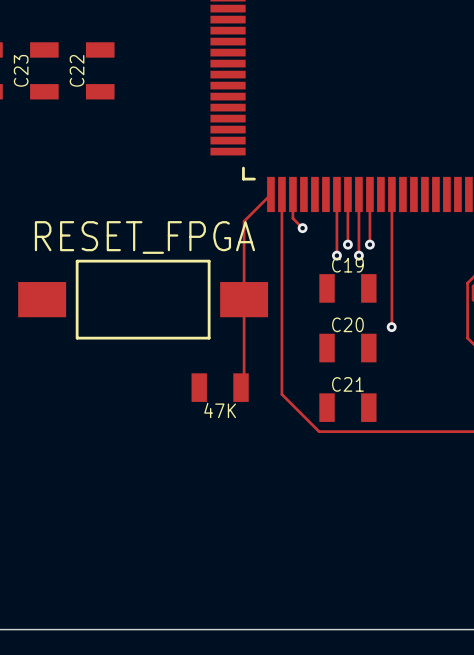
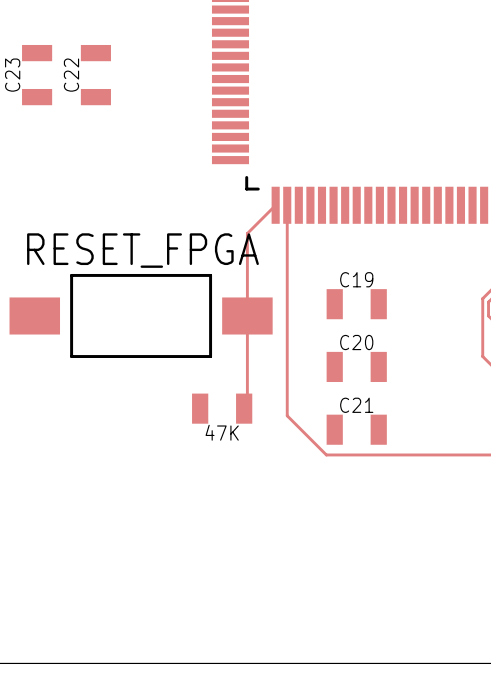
track: (292, 194) (292, 218) (302, 228) -> none
track: (336, 194) (336, 255) -> none
track: (347, 194) (347, 244) -> none
track: (358, 194) (358, 255) -> none
track: (369, 194) (369, 244) -> none
track: (391, 194) (391, 326) -> none
via: (302, 228) -> none
via: (347, 244) -> none
via: (369, 244) -> none
via: (336, 255) -> none
via: (358, 255) -> none
via: (391, 327) -> none

